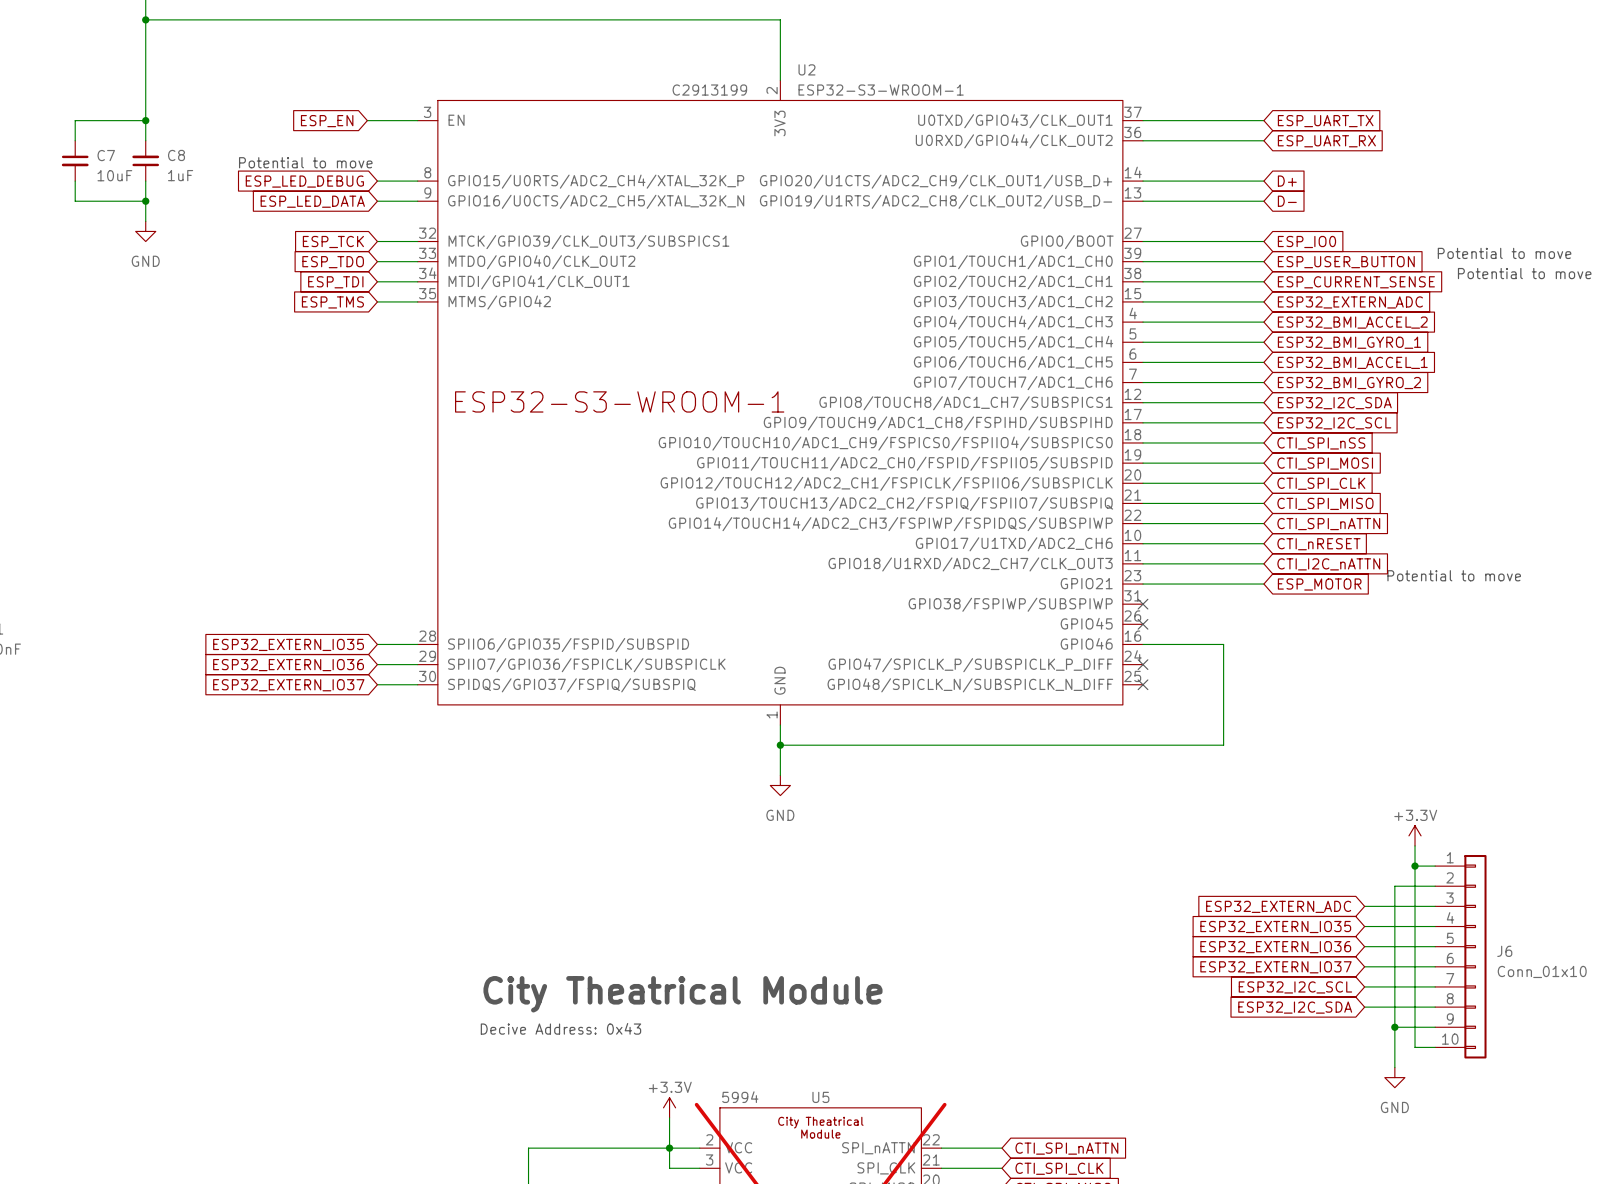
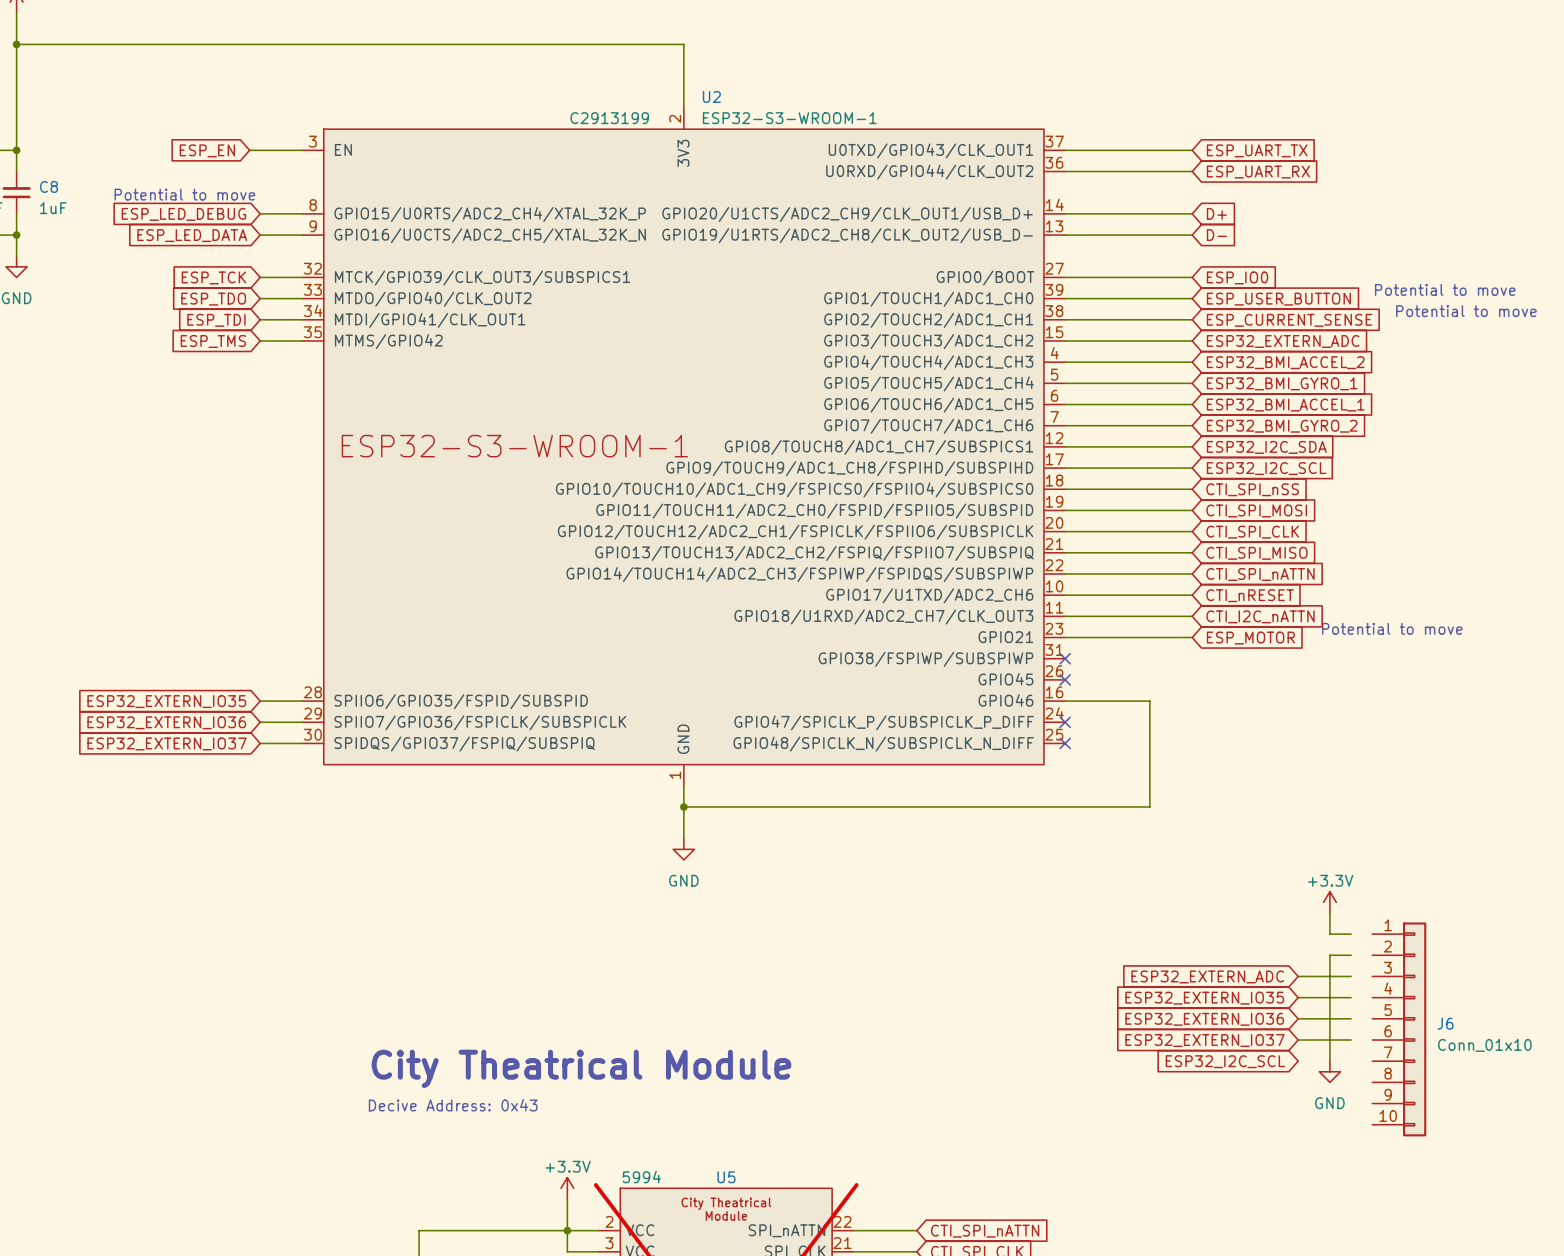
power symbol position: +3.3V (1415, 835) -> +3.3V (1329, 902)
wire: (1415, 845) (1415, 1047) (1435, 1047) -> none
wire: (1415, 866) (1435, 866) -> (1351, 934) (1329, 934) (1329, 912)
junction: (1415, 866) -> none
wire: (1415, 886) (1435, 886) -> none
wire: (1415, 906) (1435, 906) -> none
wire: (1415, 926) (1435, 926) -> none
wire: (1415, 946) (1435, 946) -> none
wire: (1415, 966) (1435, 966) -> none
wire: (1364, 986) (1435, 986) -> none
wire: (1394, 986) (1394, 1067) -> none
global label: ESP32_I2C_SDA (1295, 1007) -> none
wire: (1364, 1007) (1435, 1007) -> none
wire: (1394, 1027) (1435, 1027) -> none
junction: (1394, 1027) -> none
power symbol position: GND (1394, 1077) -> GND (1329, 1071)

